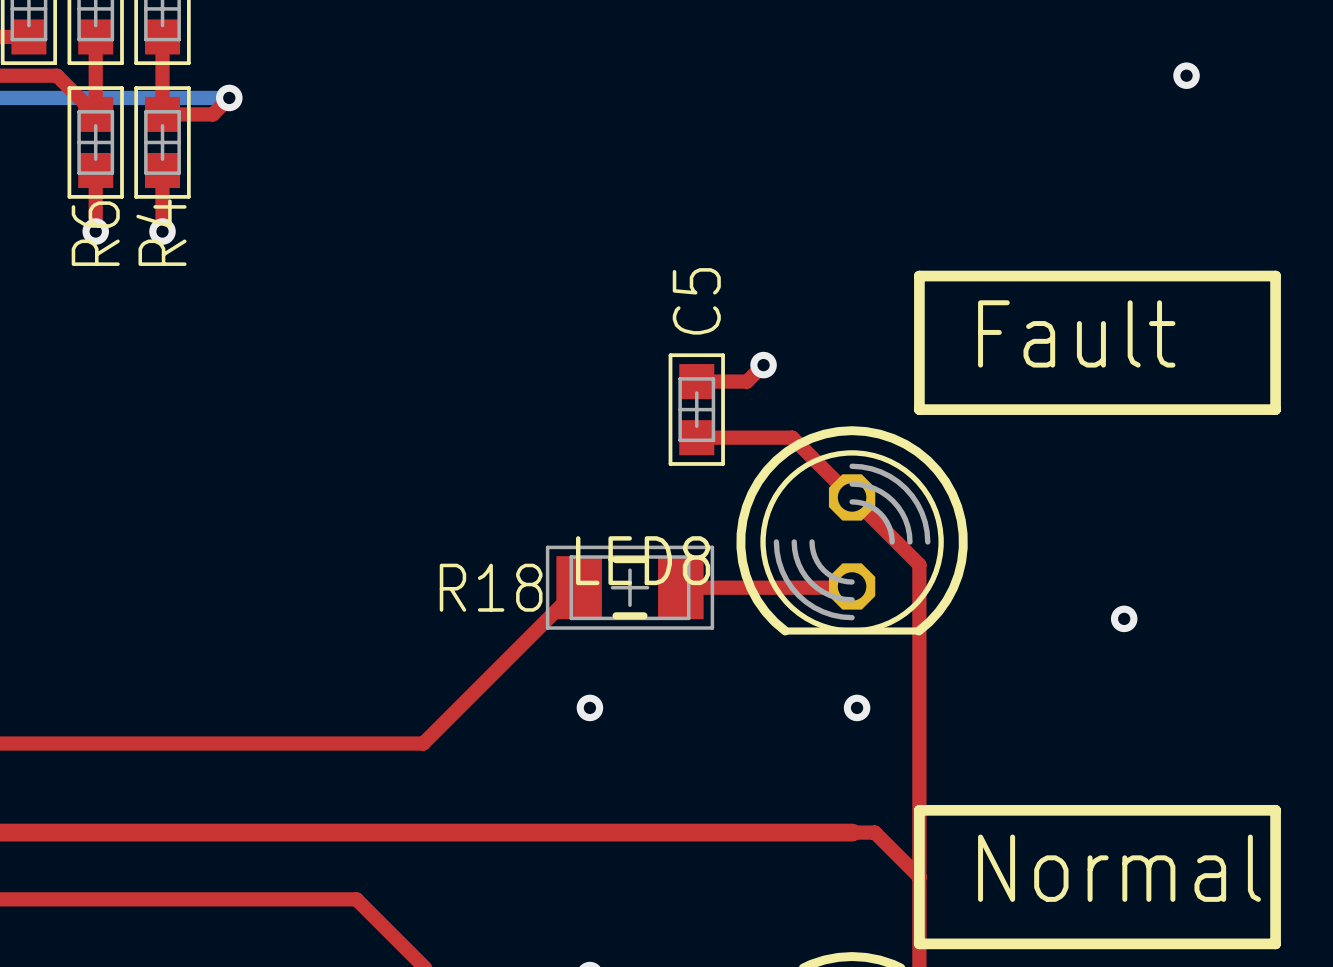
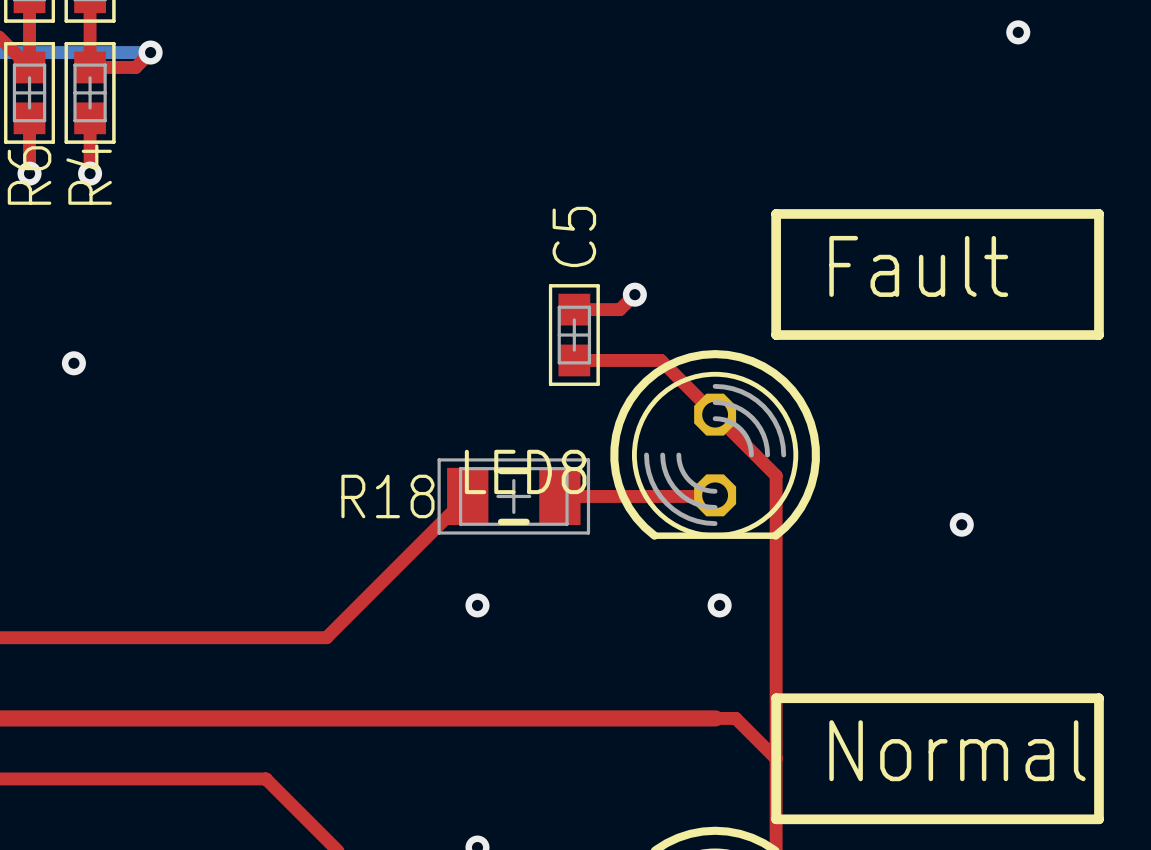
via: none -> (73, 363)

